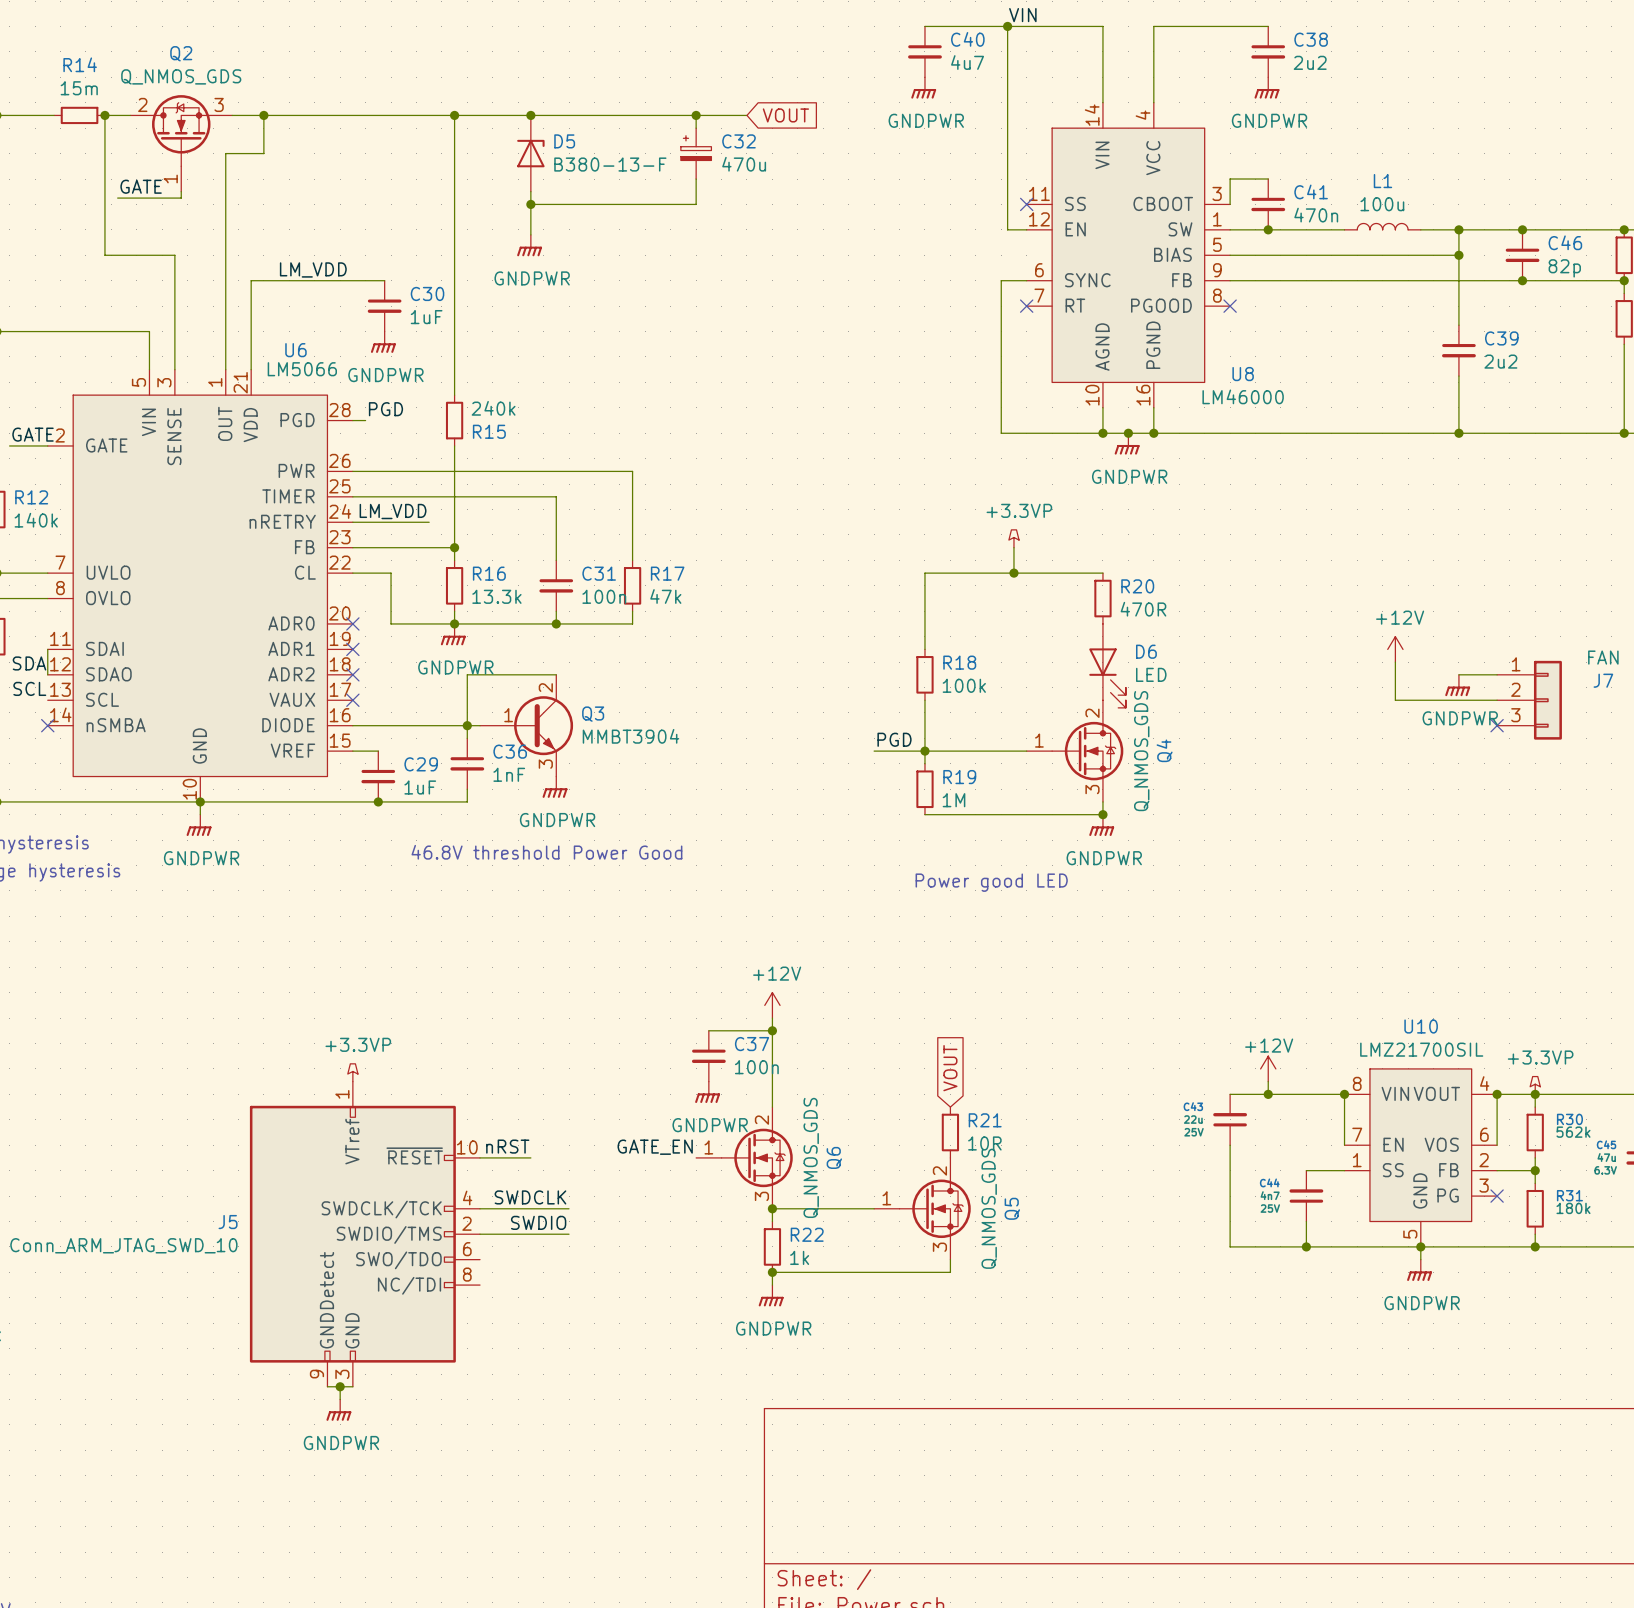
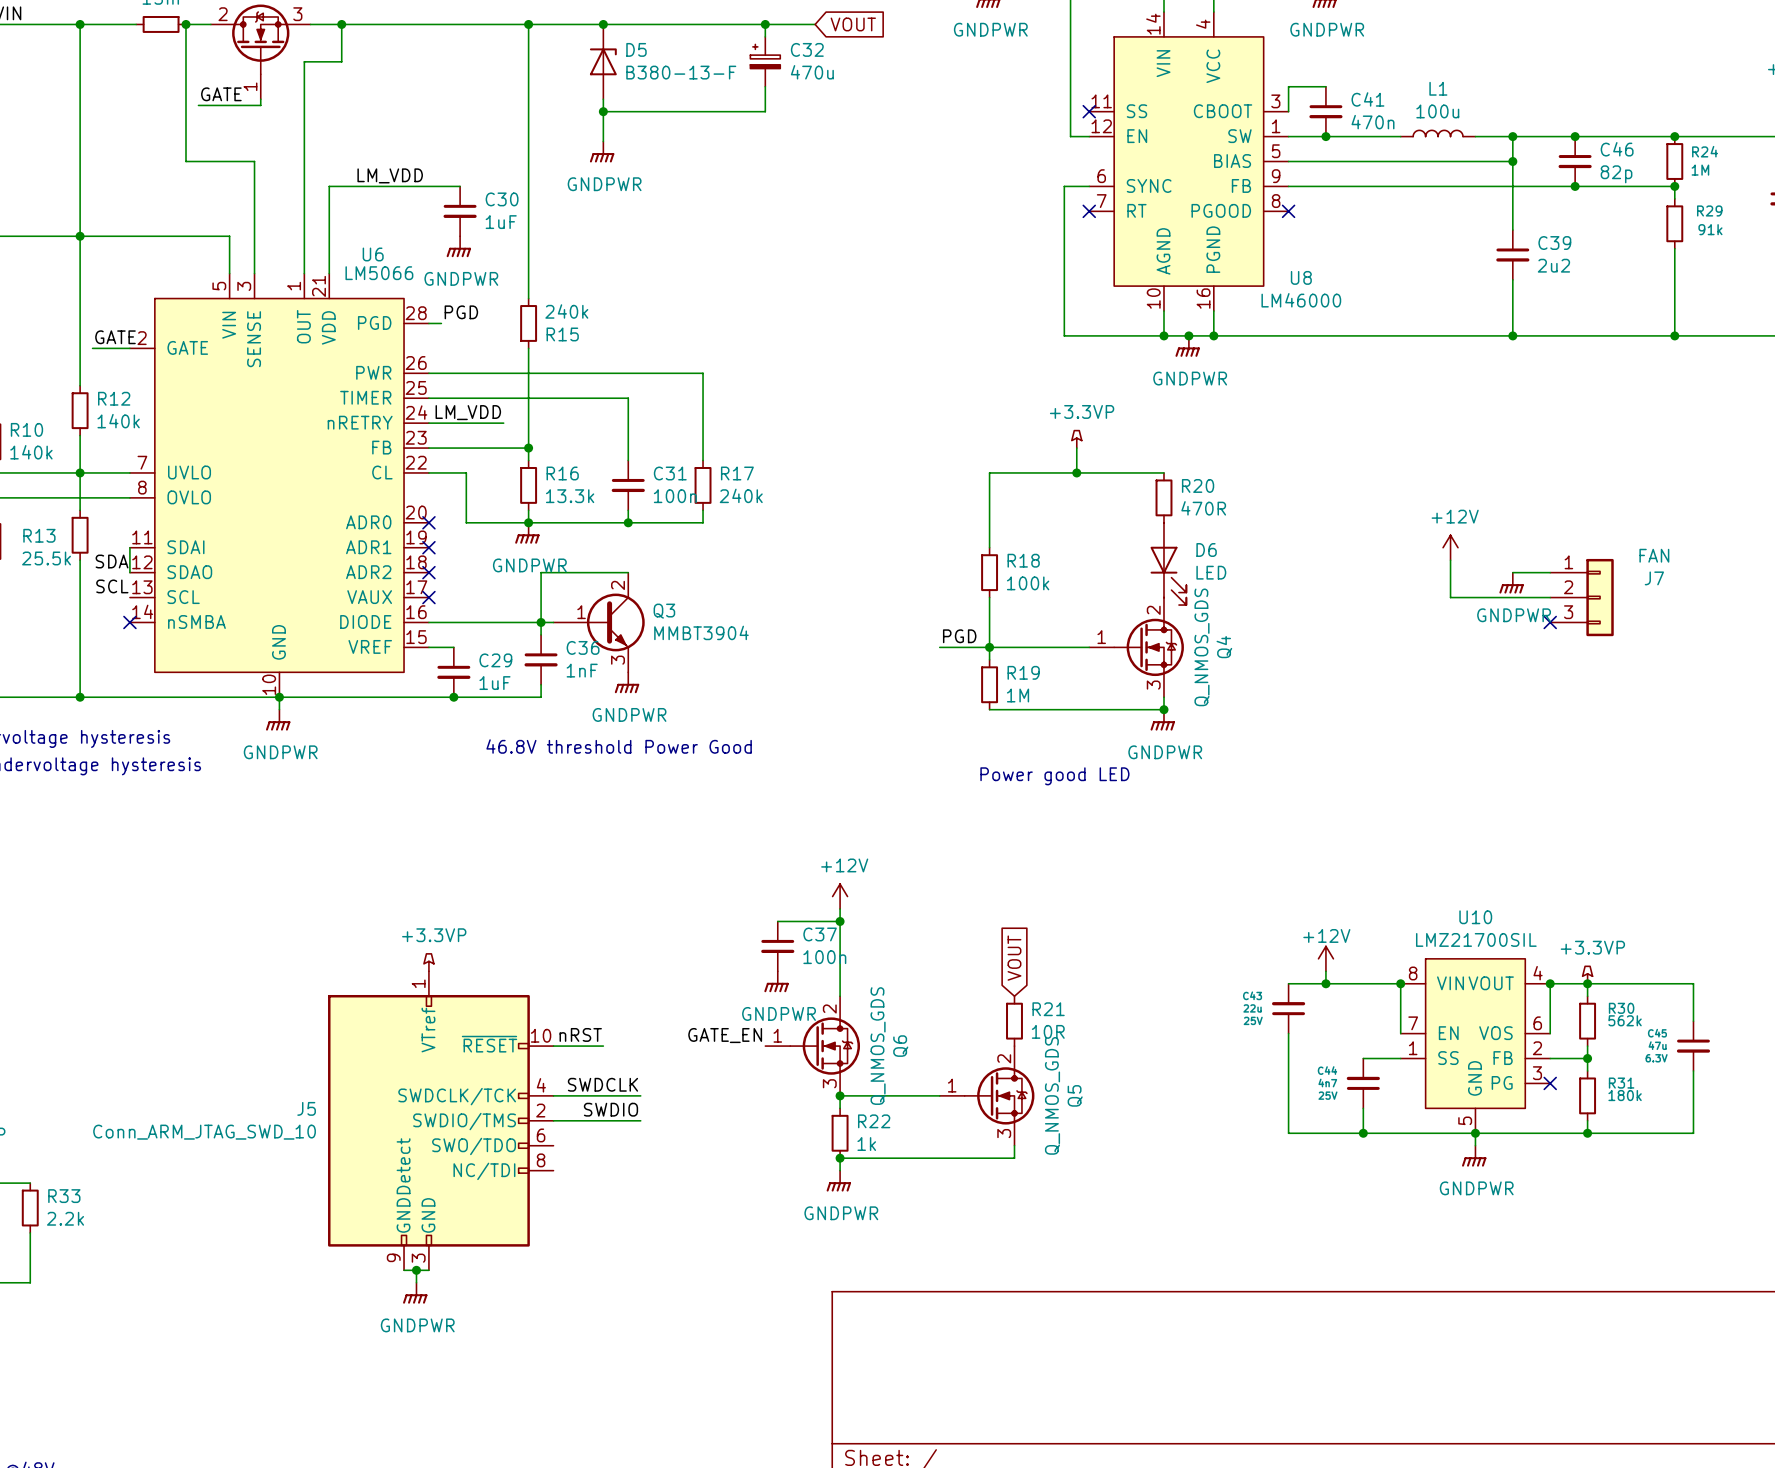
R17 value: 47k (665, 596) -> 240k (741, 495)

